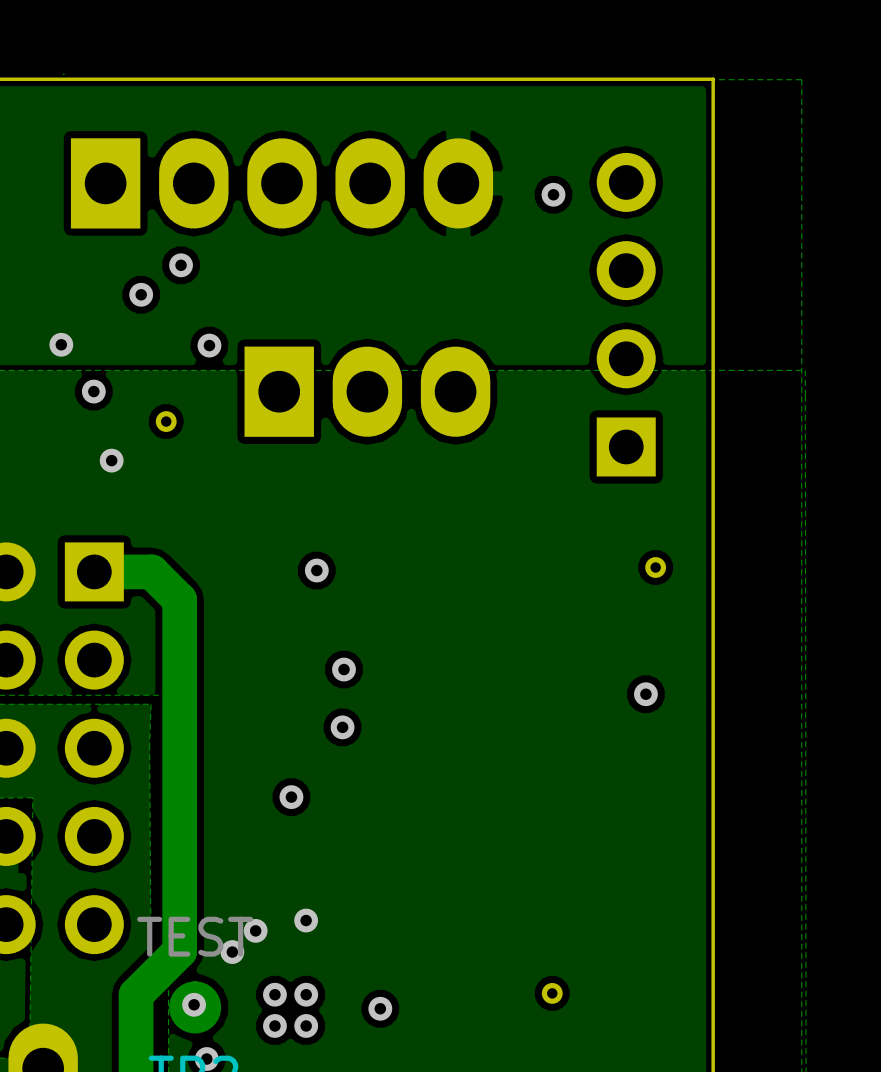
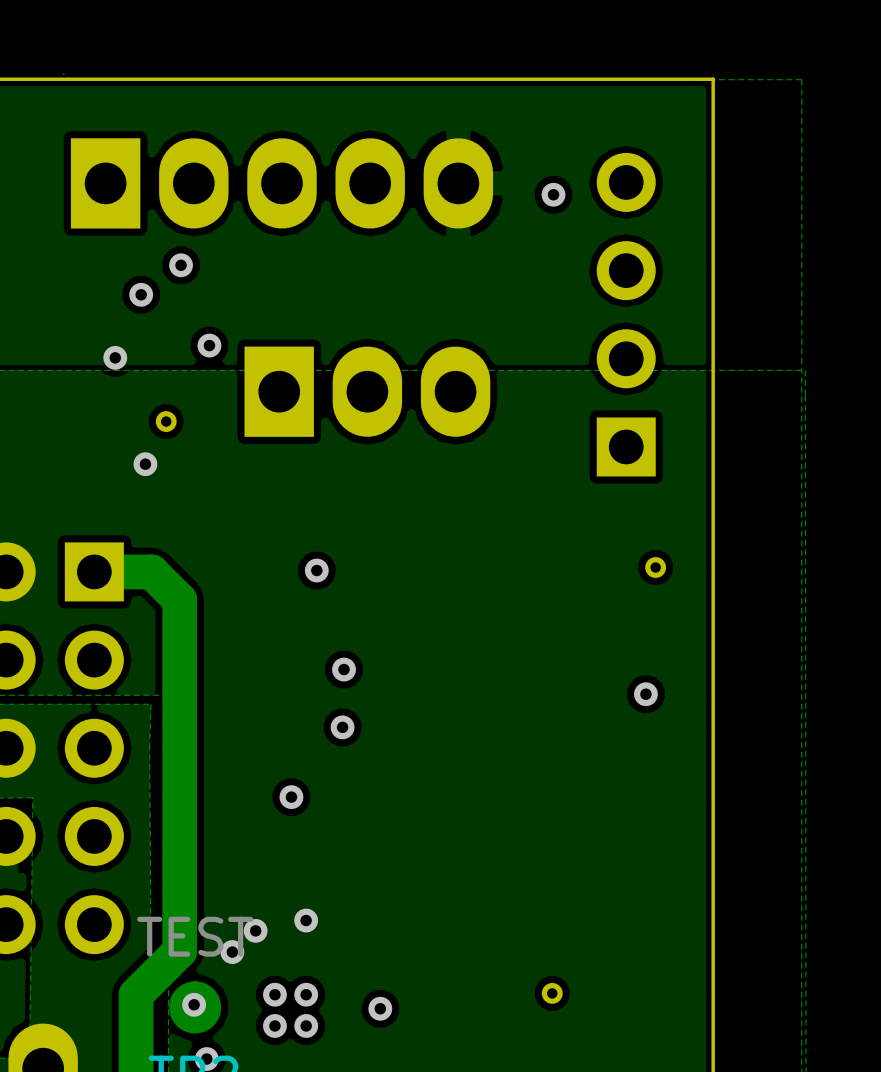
via: (61, 344) -> none
via: none -> (115, 357)
via: (93, 391) -> none
via position: (111, 460) -> (145, 464)

